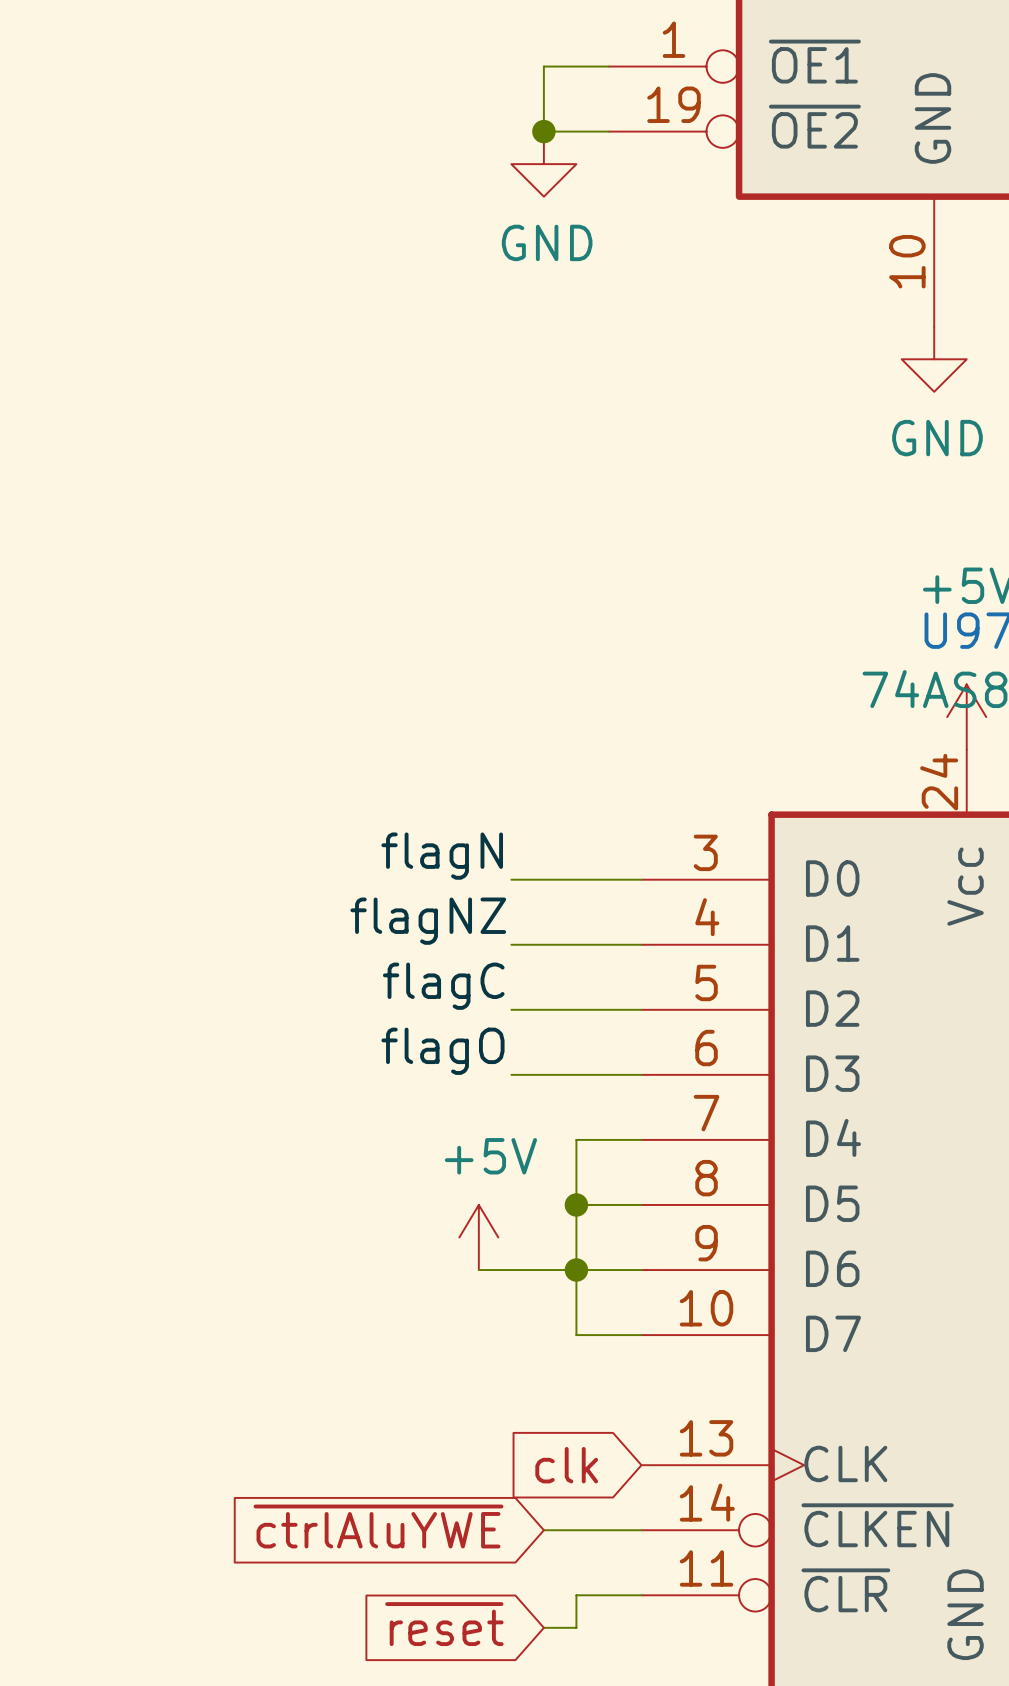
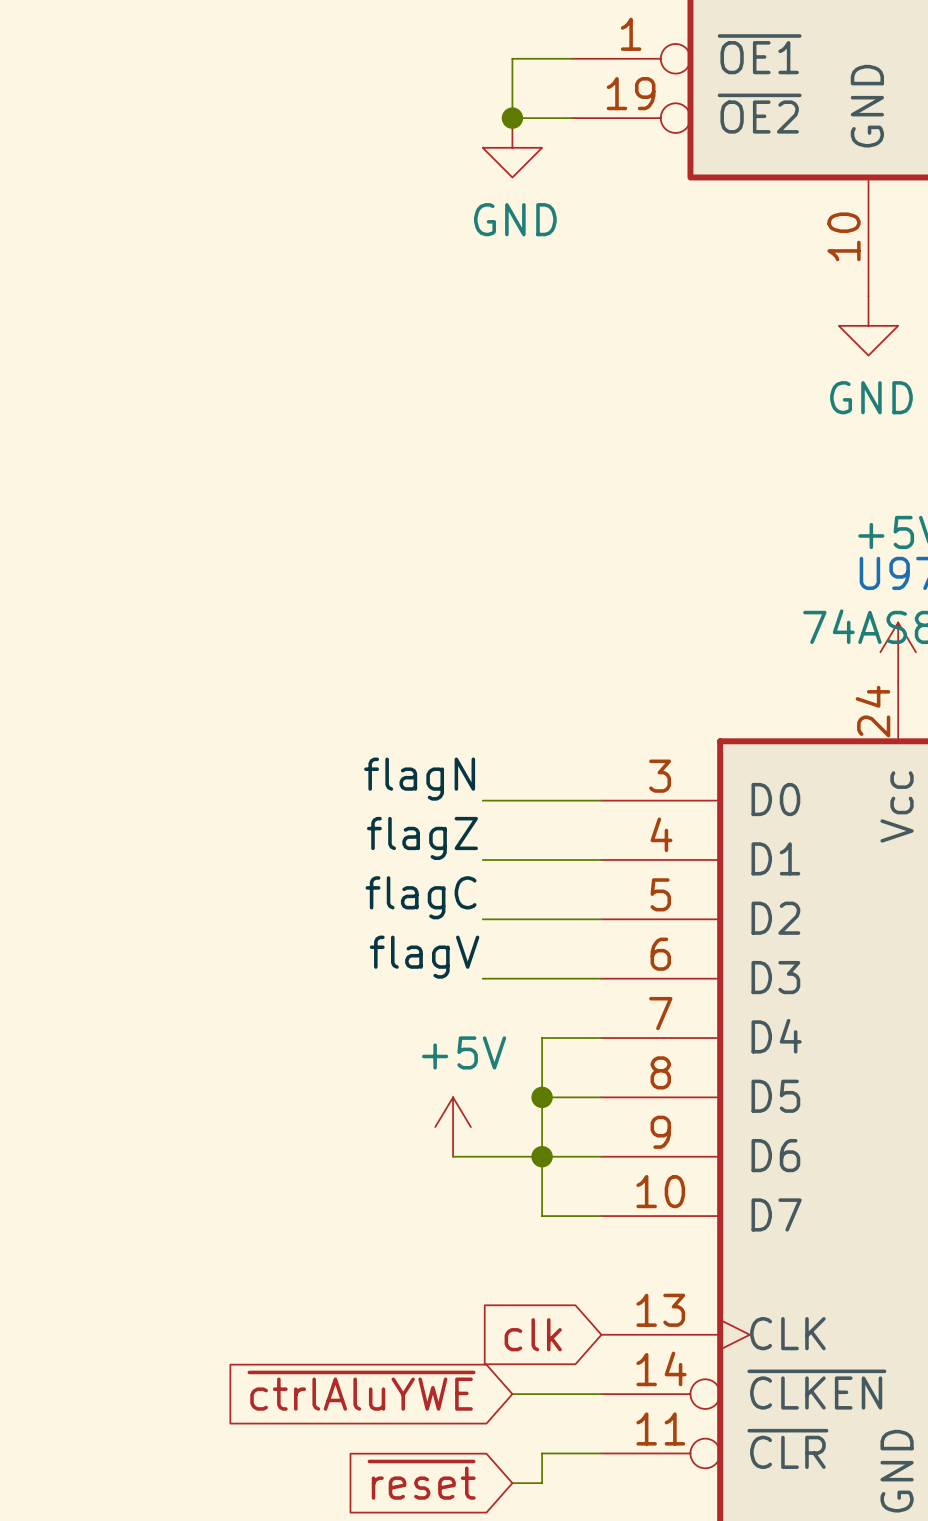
label: flagNZ (428, 921) -> flagZ (422, 838)
label: flagO (442, 1051) -> flagV (424, 957)

